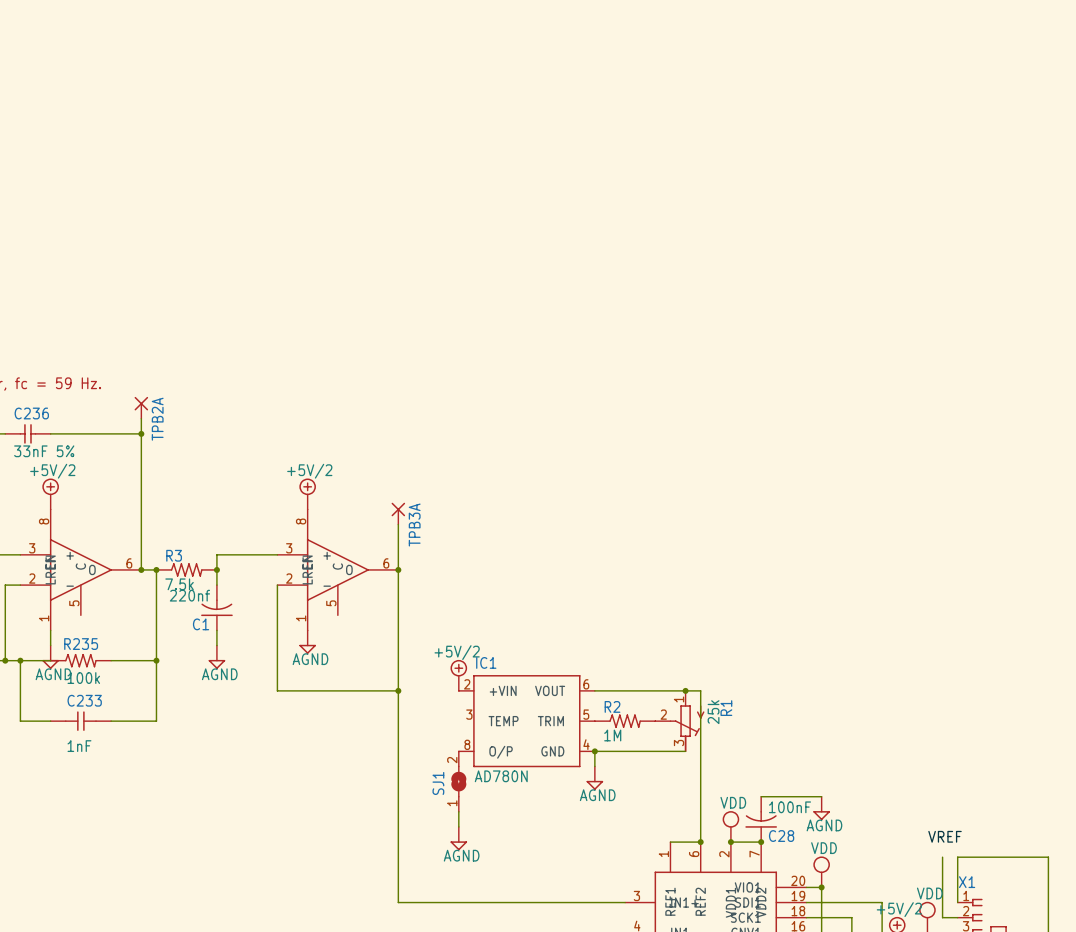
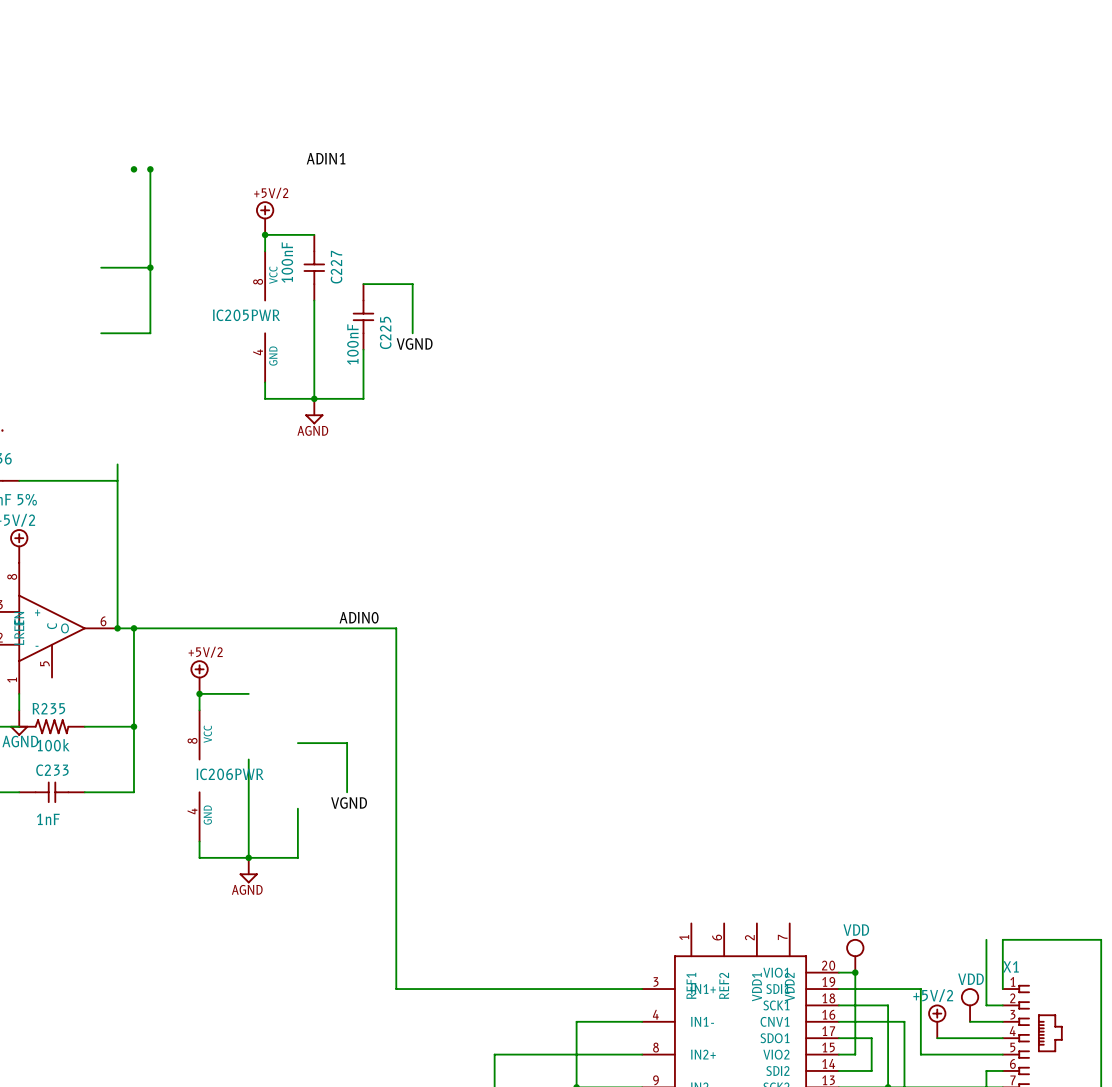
label: none -> ADIN1 (326, 158)
junction: none -> (133, 169)
wire: none -> (150, 169) (150, 333) (101, 333)
junction: none -> (150, 169)
power symbol: none -> (265, 218)
junction: none -> (265, 234)
wire: none -> (314, 234) (265, 234) (265, 251)
wire: none -> (101, 267) (150, 267)
junction: none -> (150, 267)
C227: none -> 100nF (314, 267)
wire: none -> (363, 284) (412, 284) (412, 333)
wire: none -> (314, 300) (314, 398)
IC205PWR: none -> (265, 316)
C225: none -> 100nF (363, 316)
label: none -> VGND (414, 344)
wire: none -> (363, 349) (363, 398) (265, 398) (265, 382)
junction: none -> (314, 398)
power symbol: none -> (314, 411)
TPB2A: (141, 407) -> none
junction: (141, 433) -> none
power symbol: +5V/2 (307, 494) -> none
TPB3A: (398, 513) -> none
wire: (398, 524) (398, 569) -> (133, 628) (396, 628)
wire: (277, 554) (216, 554) (216, 585) -> none
label: none -> ADIN0 (359, 617)
R3: 7.5k (186, 569) -> none
junction: (216, 569) -> none
part: (337, 569) -> none
junction: (398, 569) -> none
wire: (277, 585) (277, 690) (398, 690) -> none
C1: 220nf (216, 607) -> none
power symbol: none -> (199, 677)
wire: none -> (199, 693) (248, 693)
junction: none -> (199, 693)
power symbol: AGND (307, 642) -> none
power symbol: AGND (216, 657) -> none
wire: none -> (297, 743) (347, 743) (347, 792)
power symbol: +5V/2 (458, 675) -> none
wire: none -> (248, 759) (248, 857)
junction: (398, 690) -> none
wire: (594, 690) (700, 690) (700, 842) (670, 842) -> none
junction: (685, 690) -> none
IC206PWR: none -> (199, 775)
IC1: AD780N (526, 721) -> none
R2: 1M (625, 721) -> none
R1: 25k (679, 721) -> none
label: none -> VGND (349, 803)
wire: none -> (297, 808) (297, 857) (199, 857) (199, 841)
junction: (594, 751) -> none
wire: (685, 751) (594, 751) (594, 766) -> none
power symbol: AGND (594, 778) -> none
junction: none -> (248, 857)
SJ1: (458, 781) -> none
power symbol: none -> (248, 870)
wire: (761, 796) (821, 796) -> none
power symbol: AGND (821, 808) -> none
wire: (458, 811) (458, 826) -> none
C28: 100nF (761, 819) -> none
power symbol: VDD (730, 826) -> none
label: VREF (945, 836) -> none
power symbol: AGND (458, 838) -> none
junction: (700, 842) -> none
wire: (730, 842) (761, 842) -> none
junction: (730, 842) -> none
junction: (761, 842) -> none

